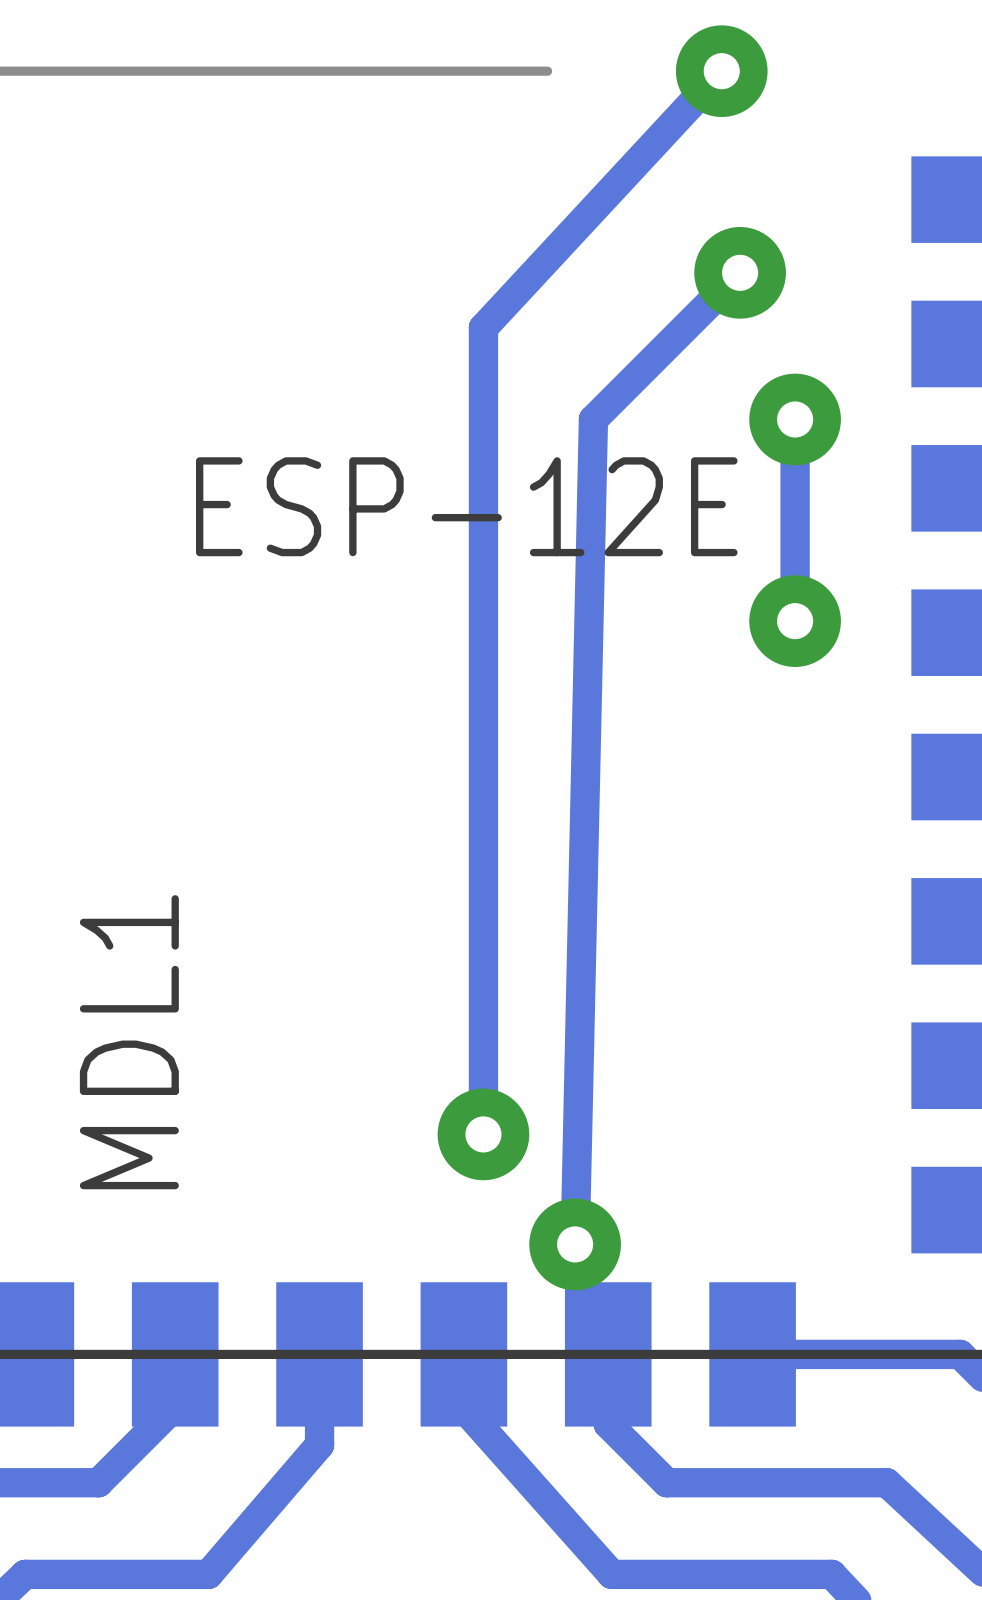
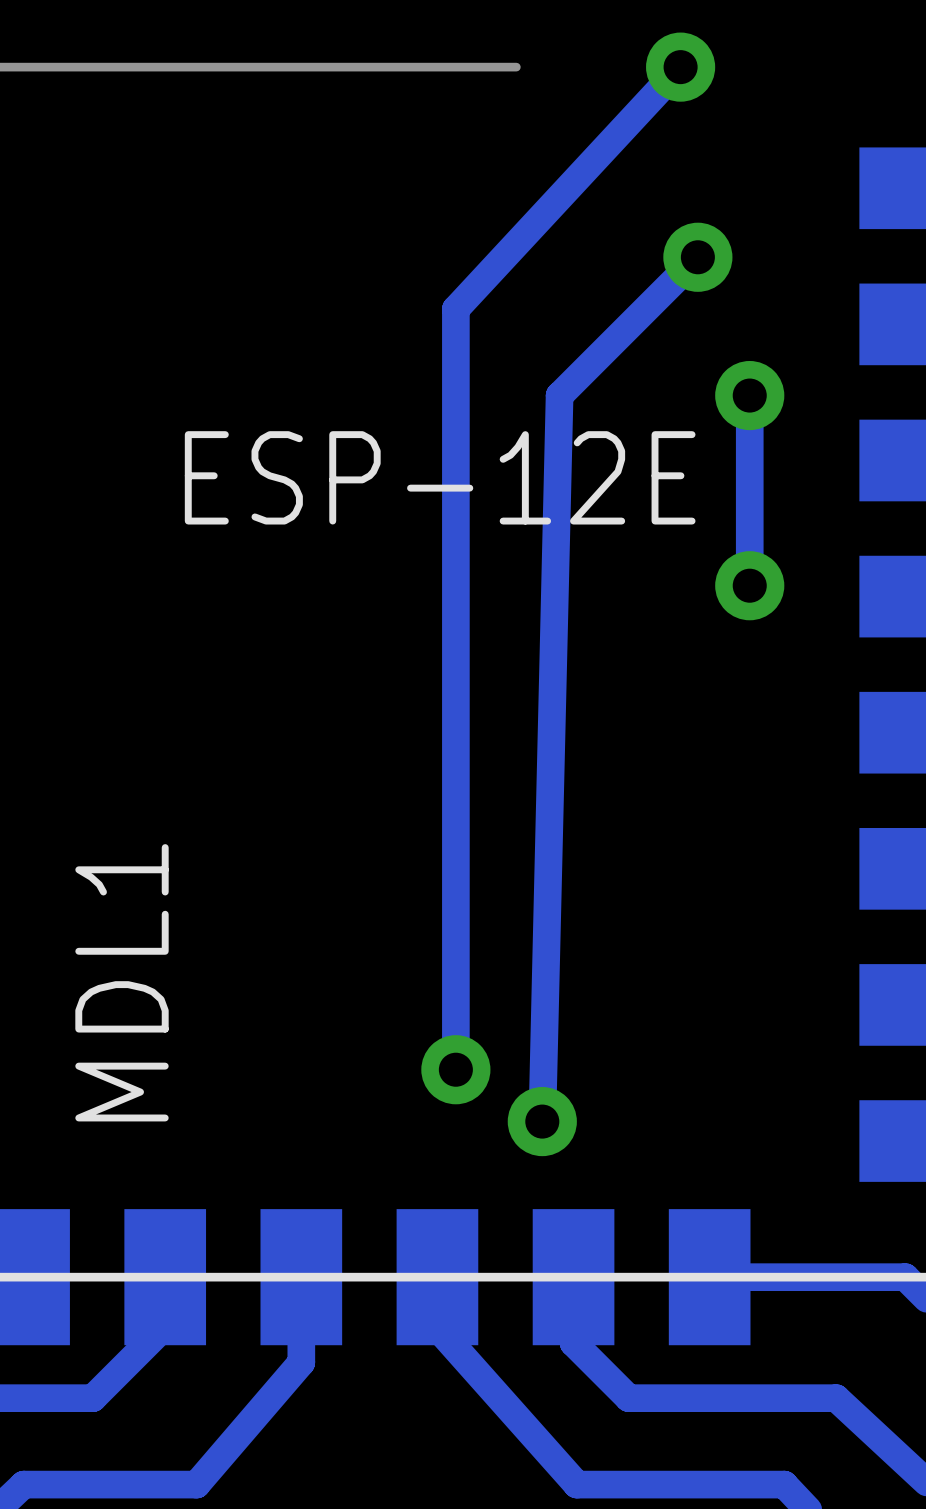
via size: [675, 25, 768, 118] -> [646, 32, 716, 102]
via size: [694, 227, 786, 319] -> [663, 222, 733, 292]
via size: [749, 373, 841, 466] -> [715, 360, 785, 431]
track: (593, 419) (575, 1244) -> (559, 395) (542, 1121)
via size: [749, 575, 841, 667] -> [715, 551, 785, 621]
via size: [437, 1088, 530, 1181] -> [421, 1035, 491, 1105]
via position: (575, 1244) -> (542, 1121)

